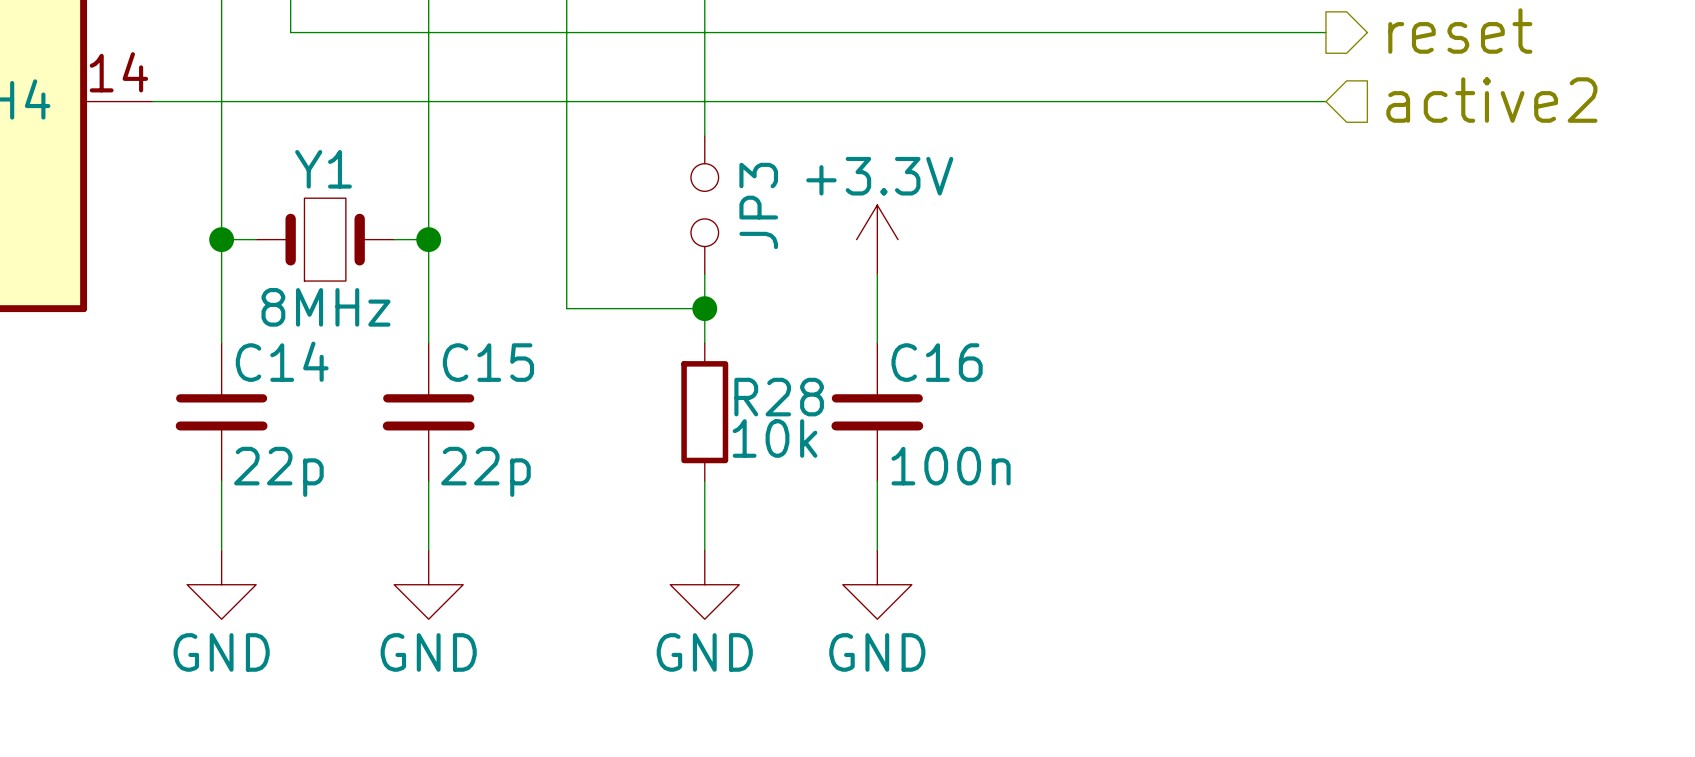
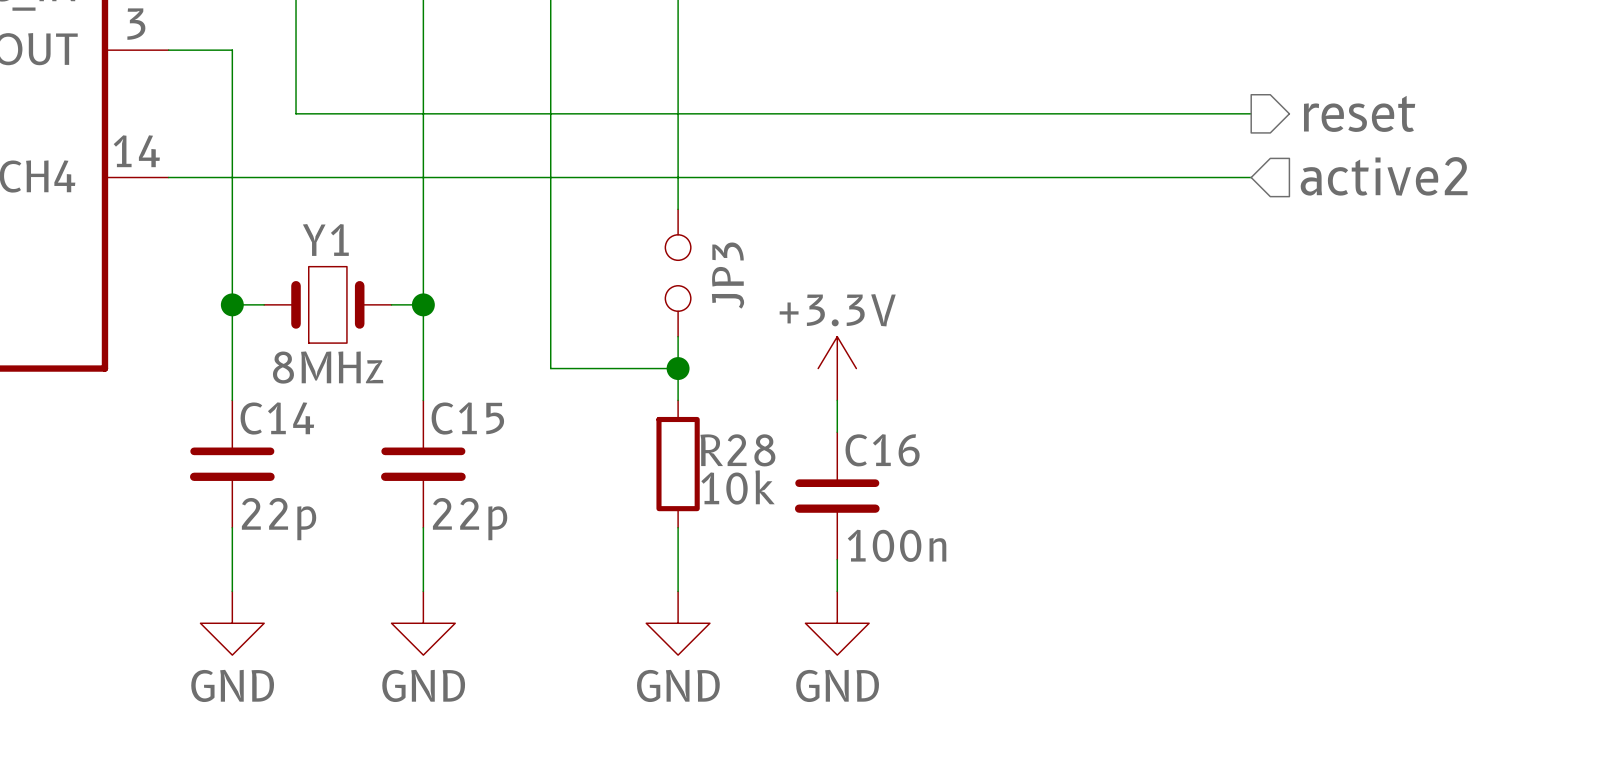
power symbol position: +3.3V (877, 239) -> +3.3V (837, 368)
C16 position: (877, 412) -> (837, 495)

